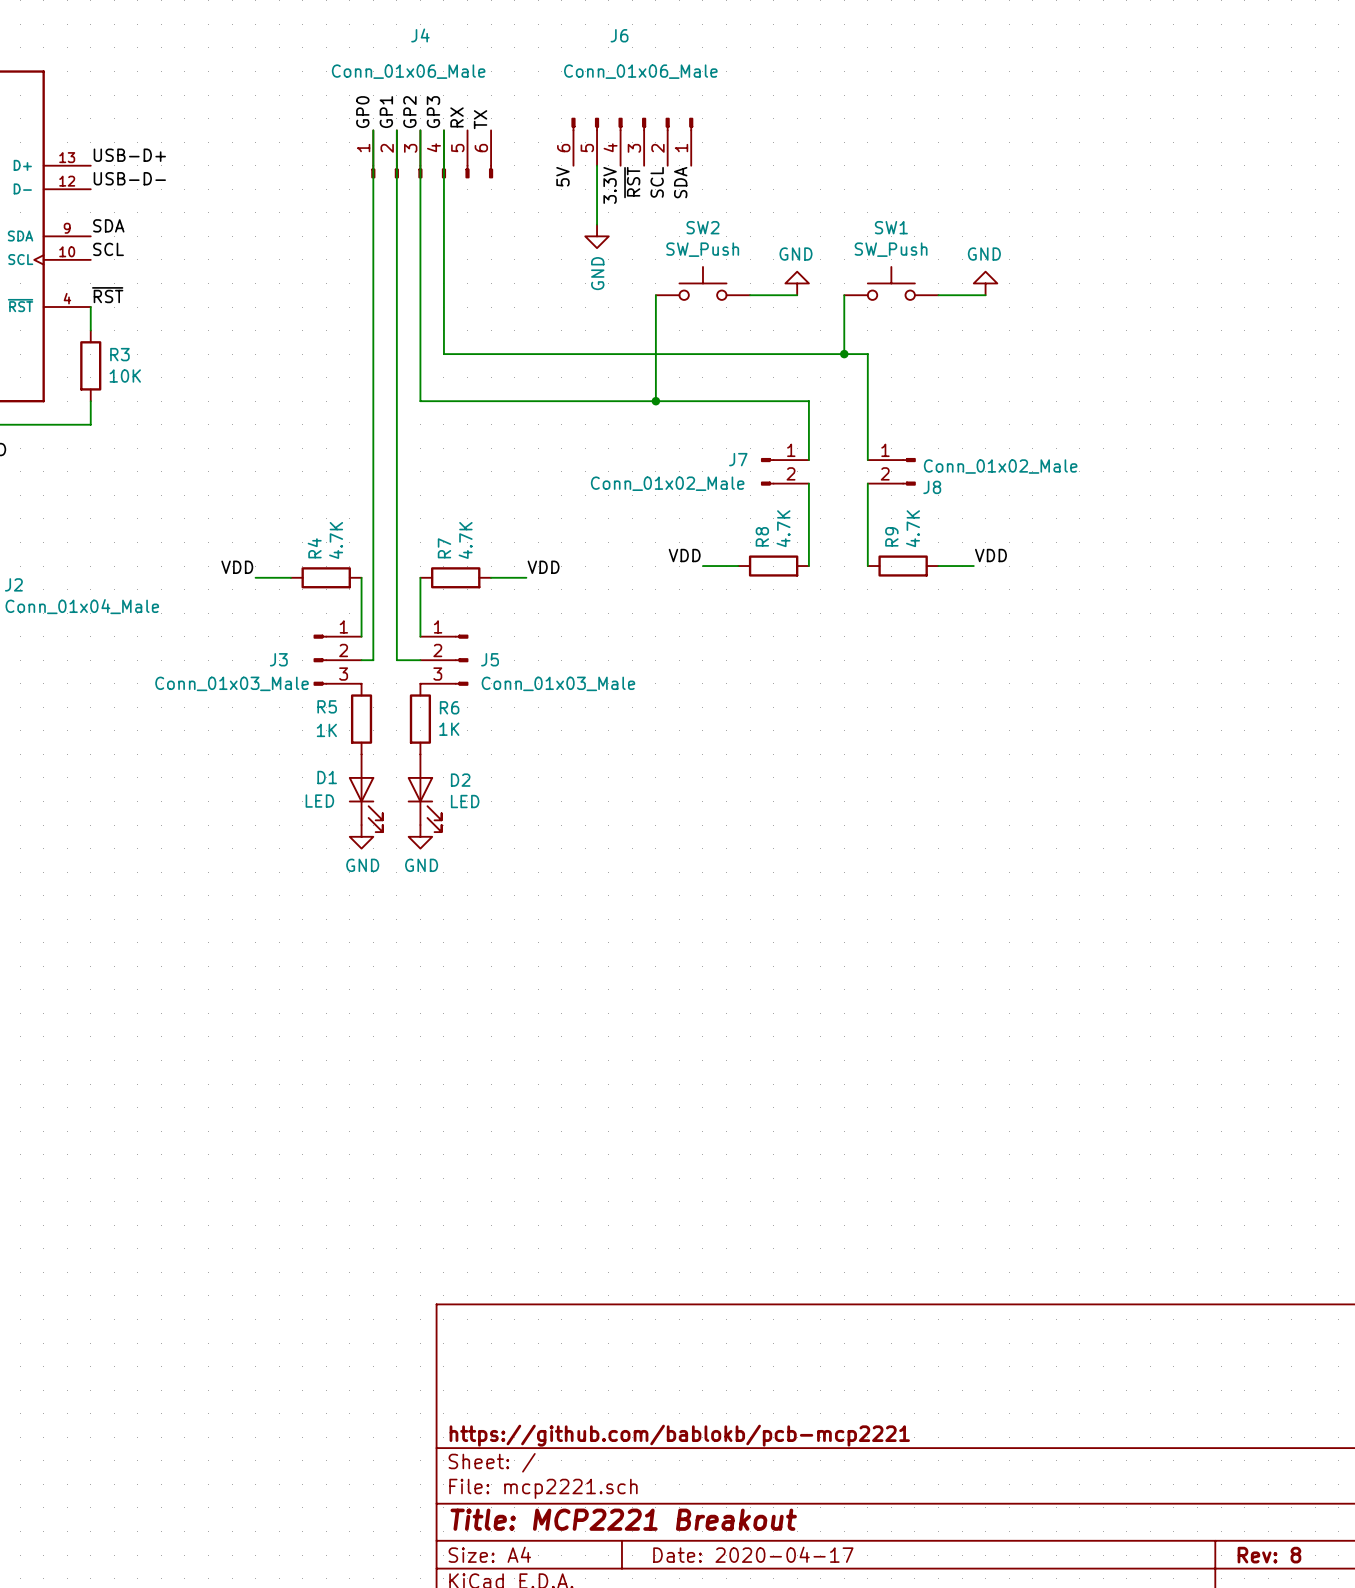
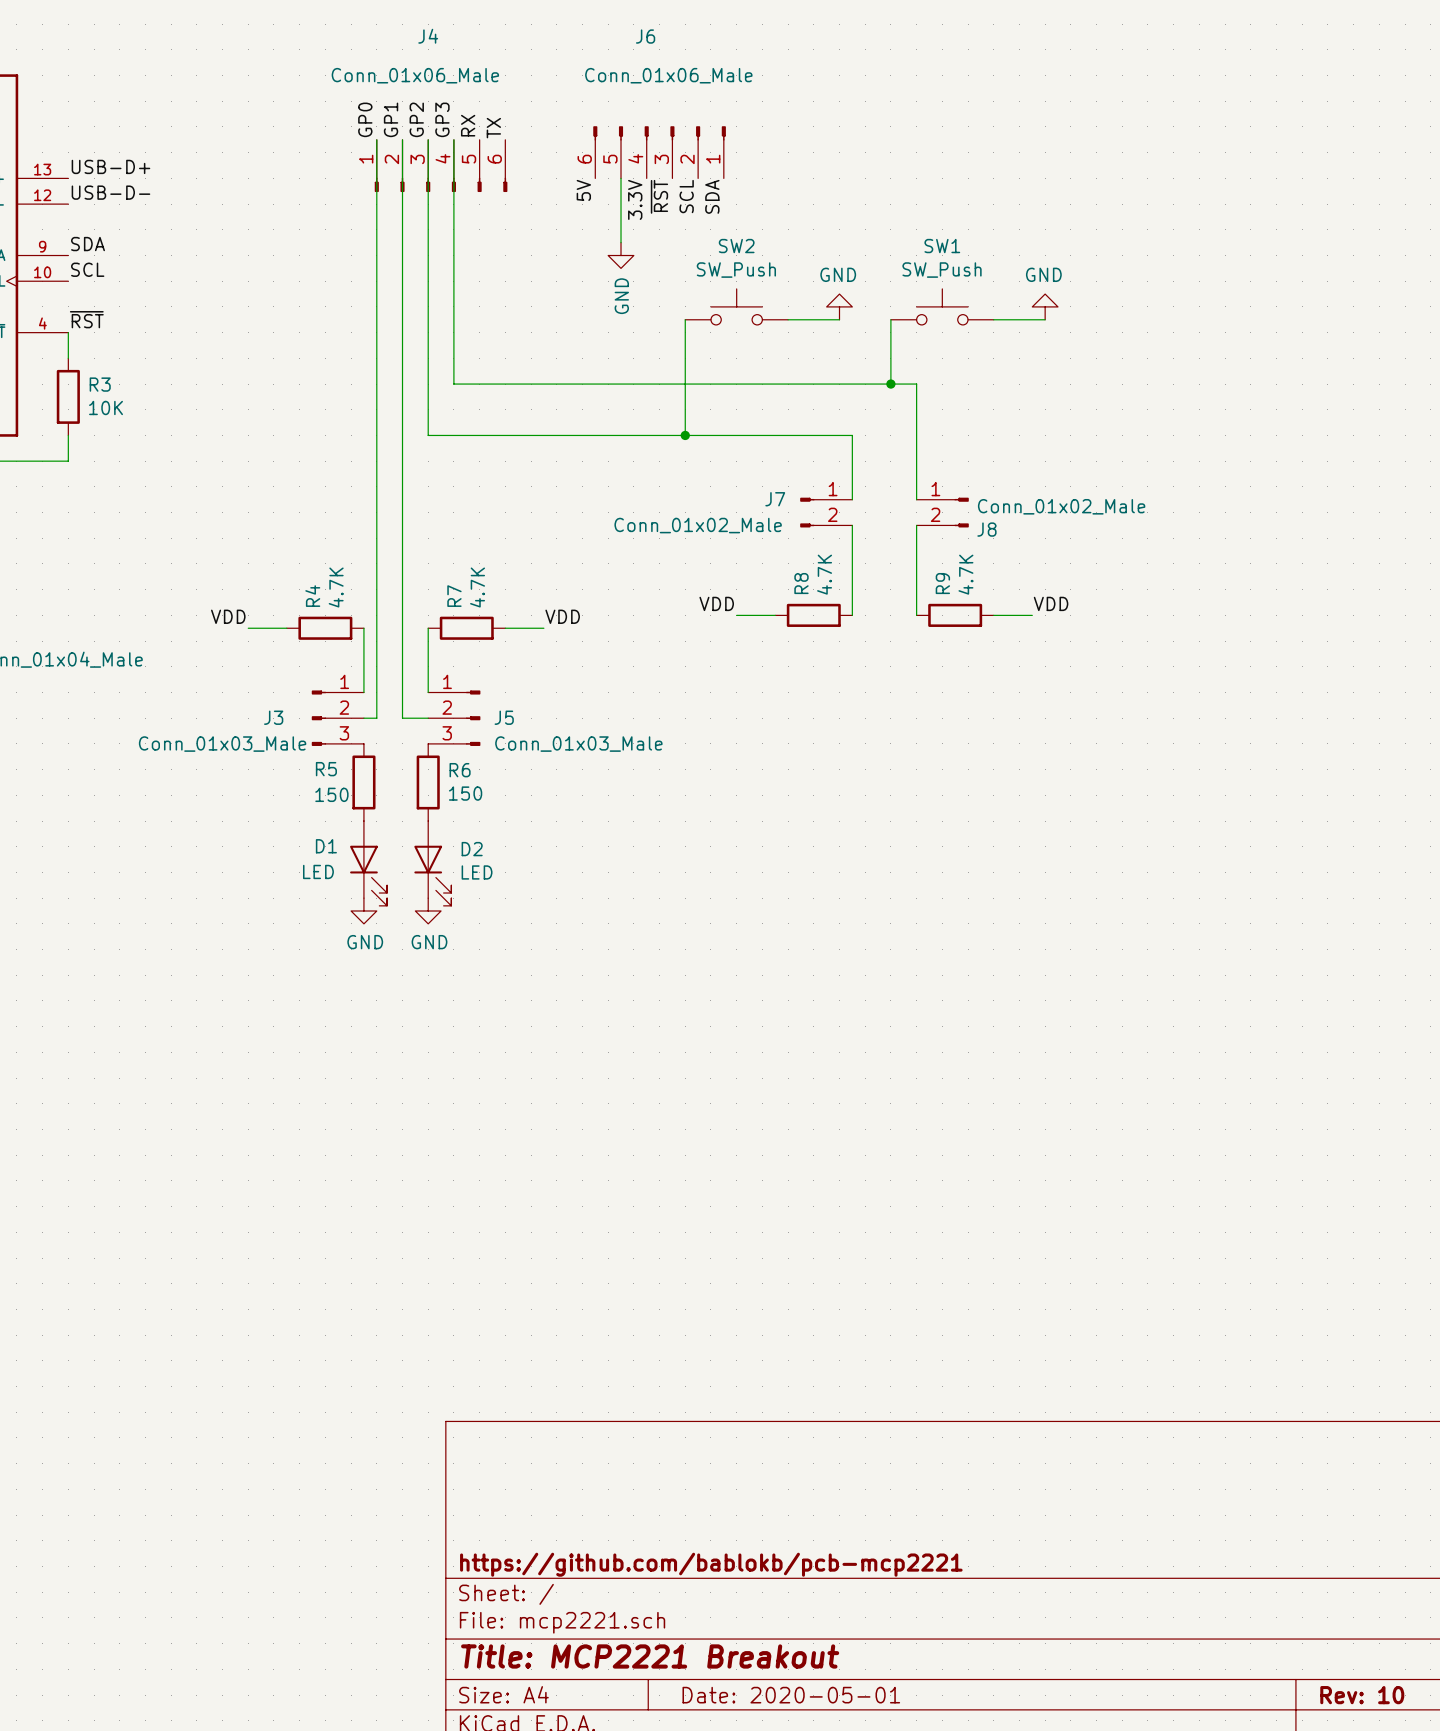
R6 value: 1K (449, 729) -> 150 (465, 793)
R5 value: 1K (326, 730) -> 150 (331, 794)
title block: Date: 2020-04-17 (753, 1554) -> Date: 2020-05-01 (791, 1695)
title block: Rev: 8 (1269, 1555) -> Rev: 10 (1362, 1695)

